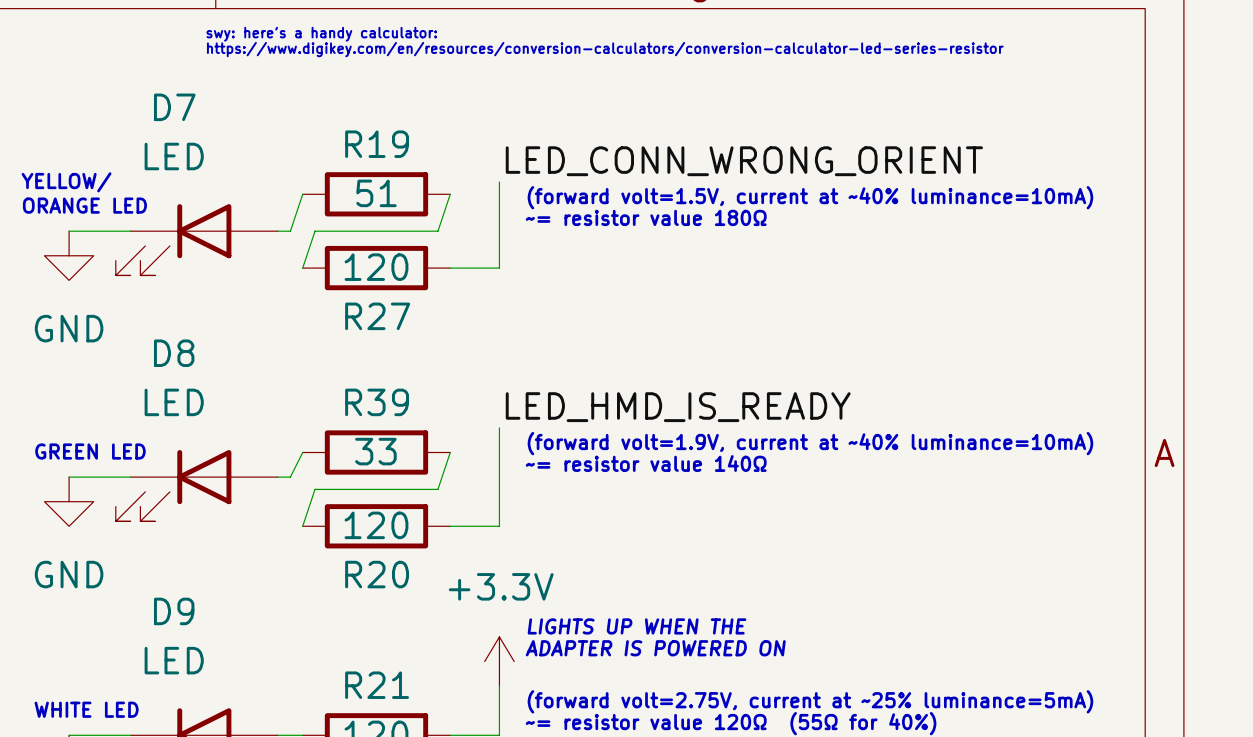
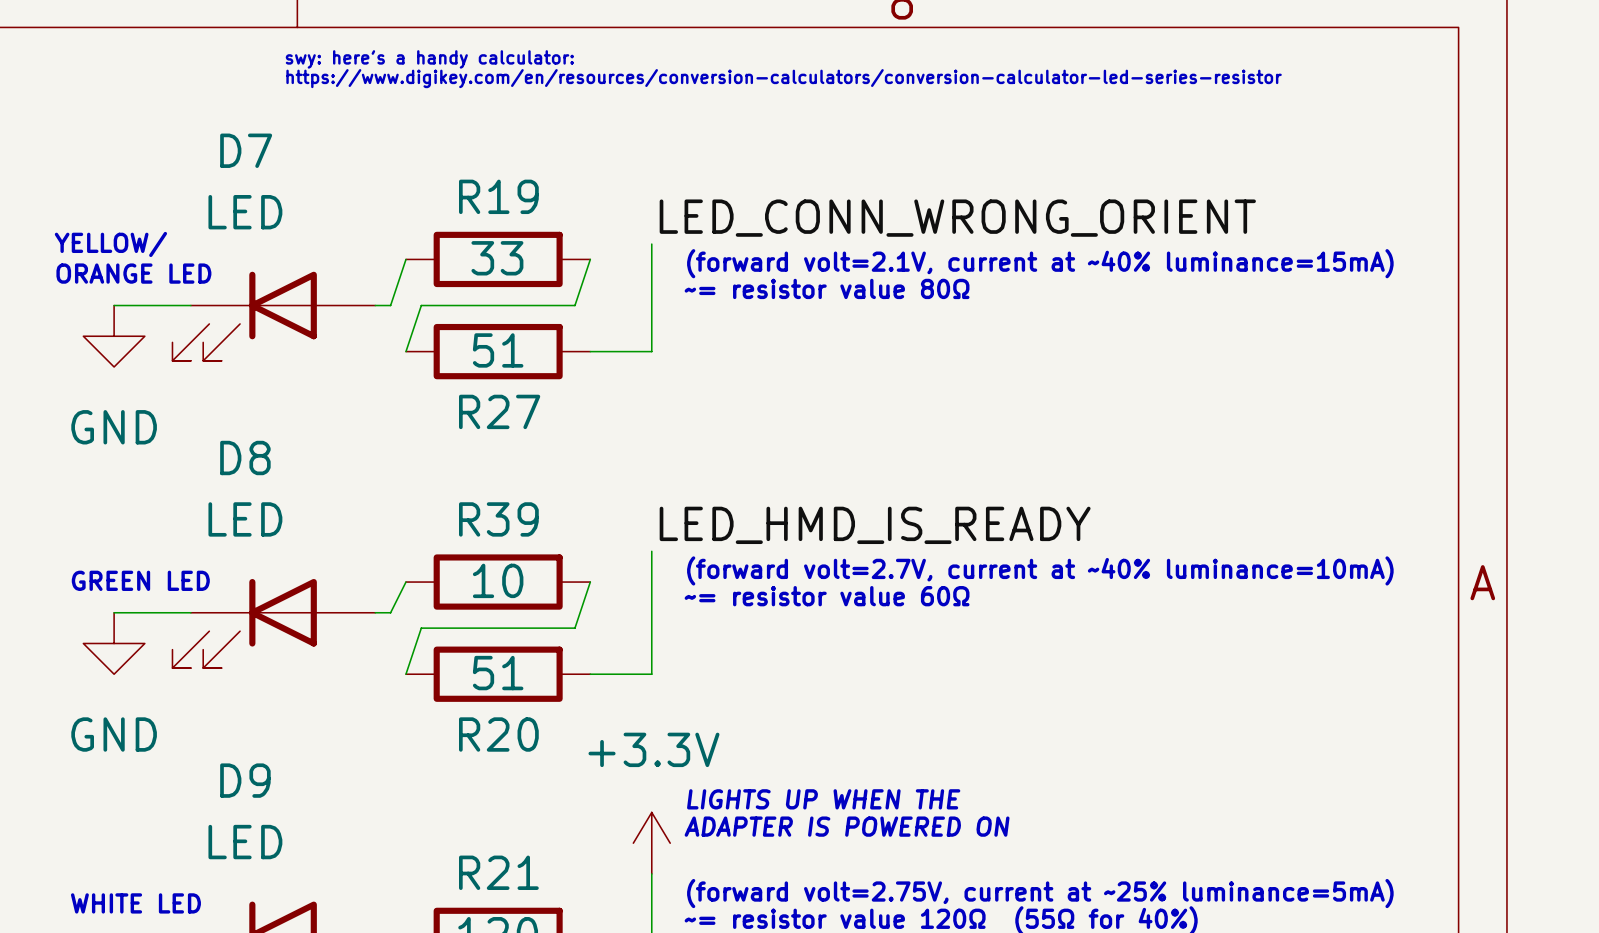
R19 value: 51 (376, 193) -> 33 (497, 258)
text: (forward volt=1.5V, current at ~40% luminance=10mA) (810, 197) -> (forward volt=2.1V, current at ~40% luminance=15mA) (1040, 263)
text: ~= resistor value 180Ω (646, 217) -> ~= resistor value 80Ω (827, 288)
R27 value: 120 (376, 267) -> 51 (498, 350)
text: (forward volt=1.9V, current at ~40% luminance=10mA) (810, 443) -> (forward volt=2.7V, current at ~40% luminance=10mA) (1040, 570)
R39 value: 33 (375, 451) -> 10 (498, 580)
text: ~= resistor value 140Ω (646, 463) -> ~= resistor value 60Ω (827, 596)
R20 value: 120 (376, 525) -> 51 (498, 673)

